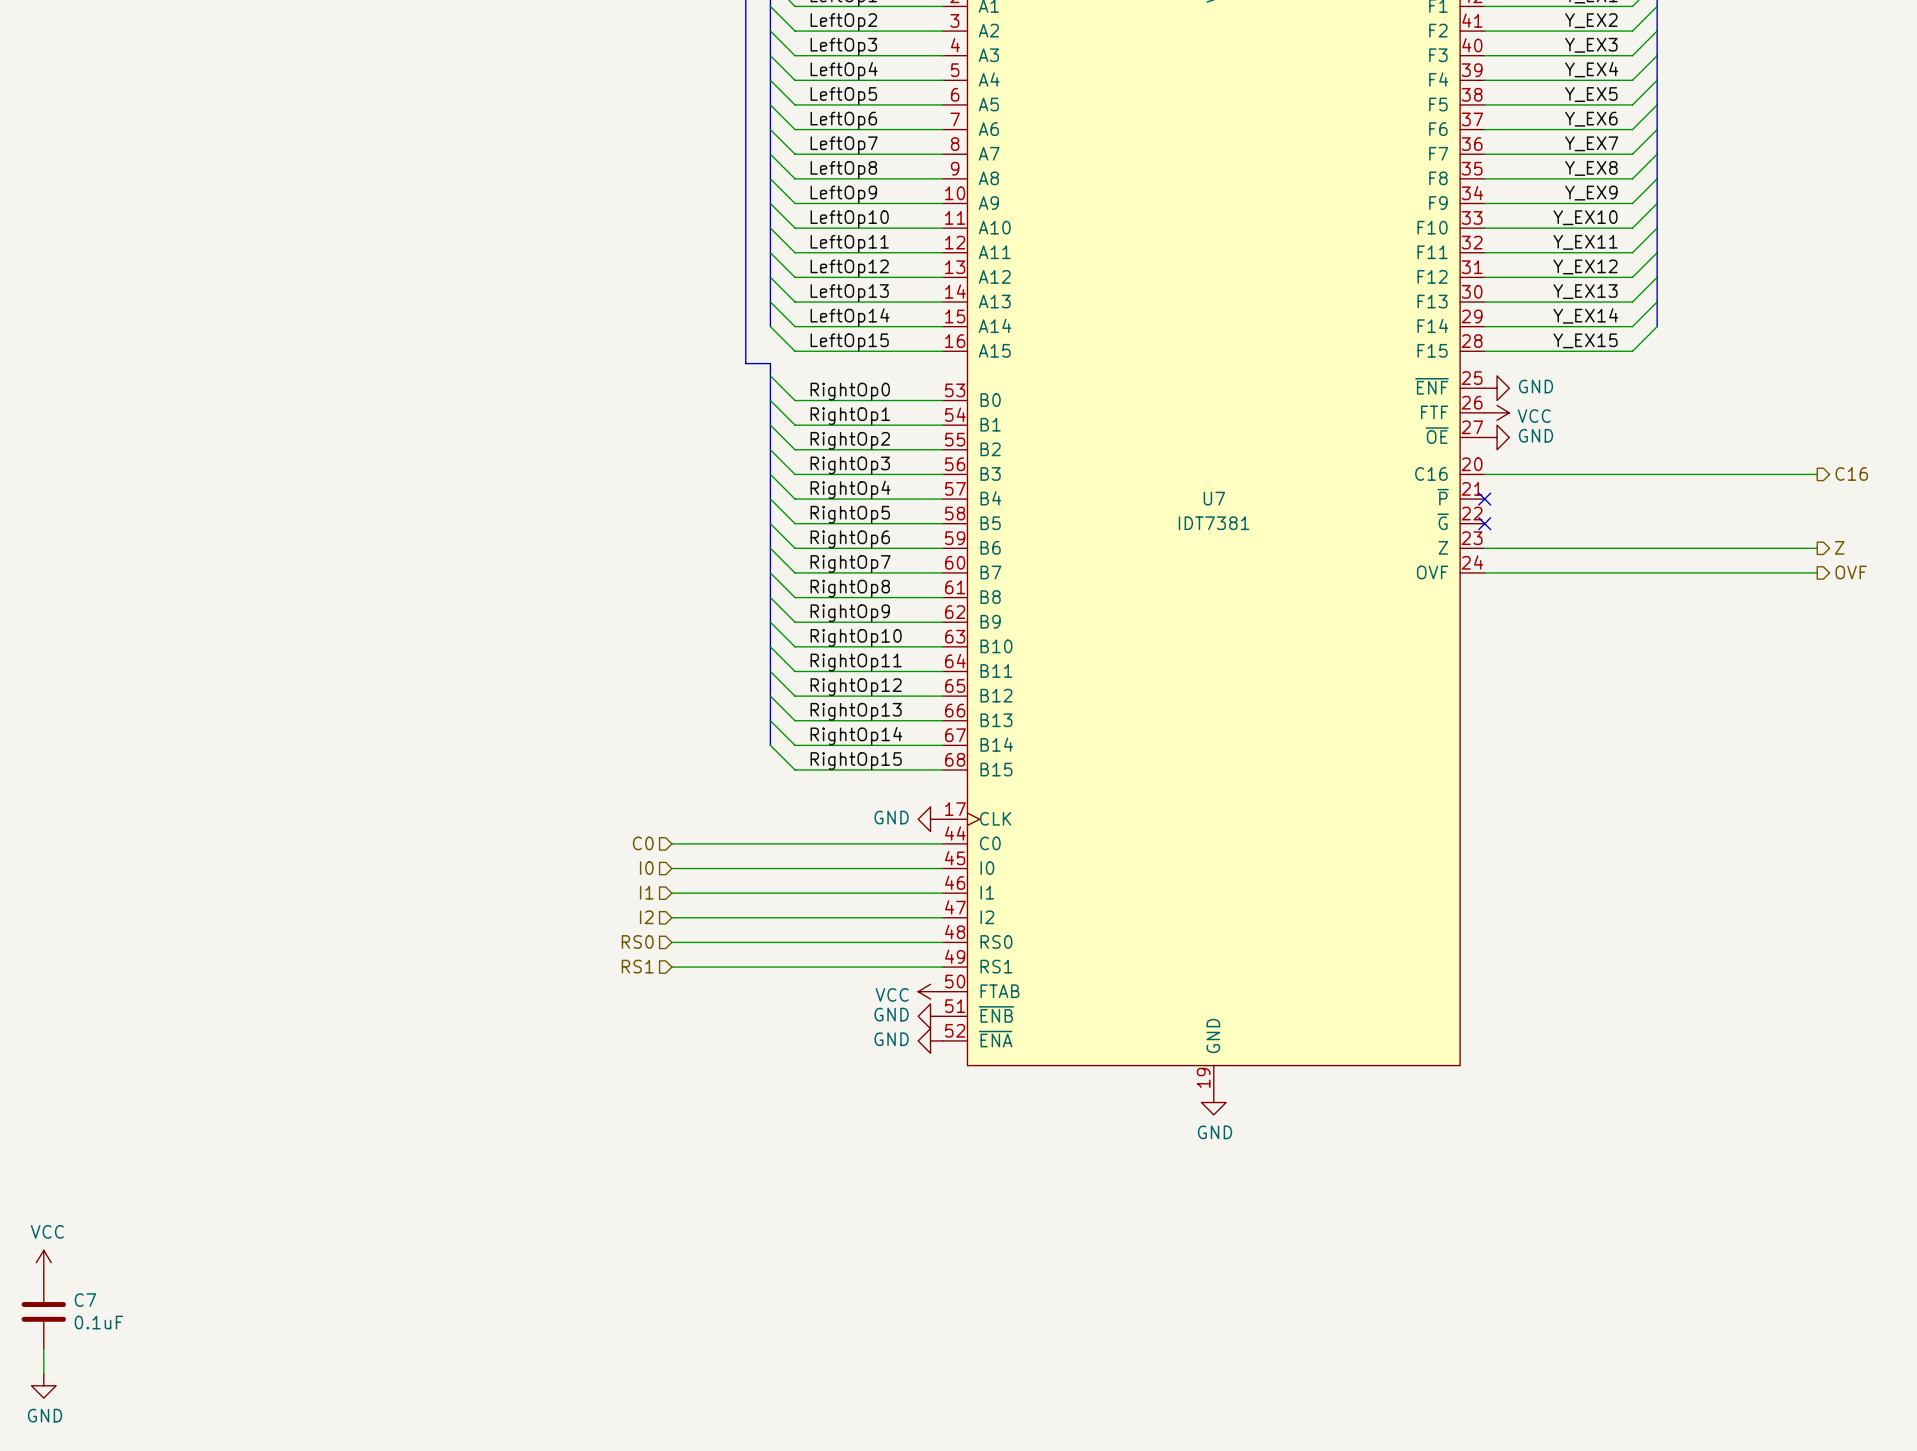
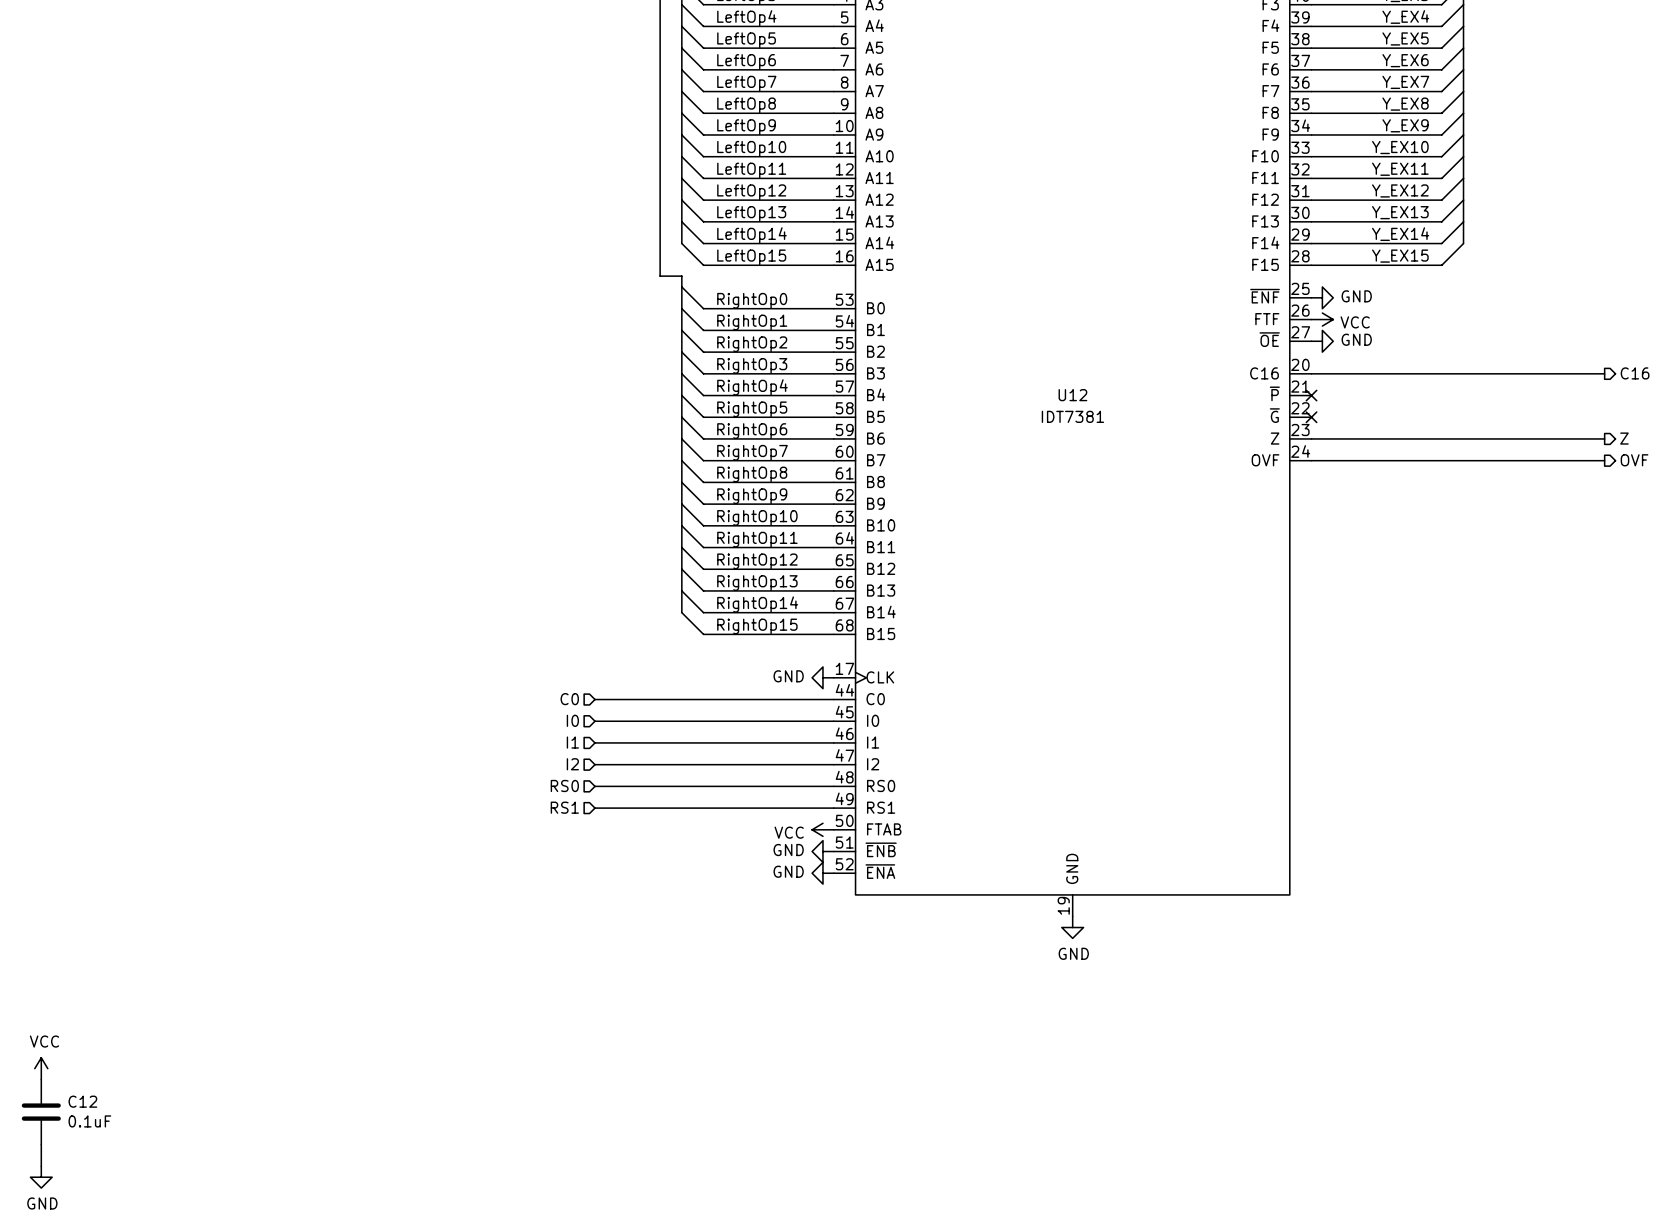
U7 name: U7 (1214, 498) -> U12 (1072, 395)
C7 name: C7 (85, 1300) -> C12 (82, 1101)

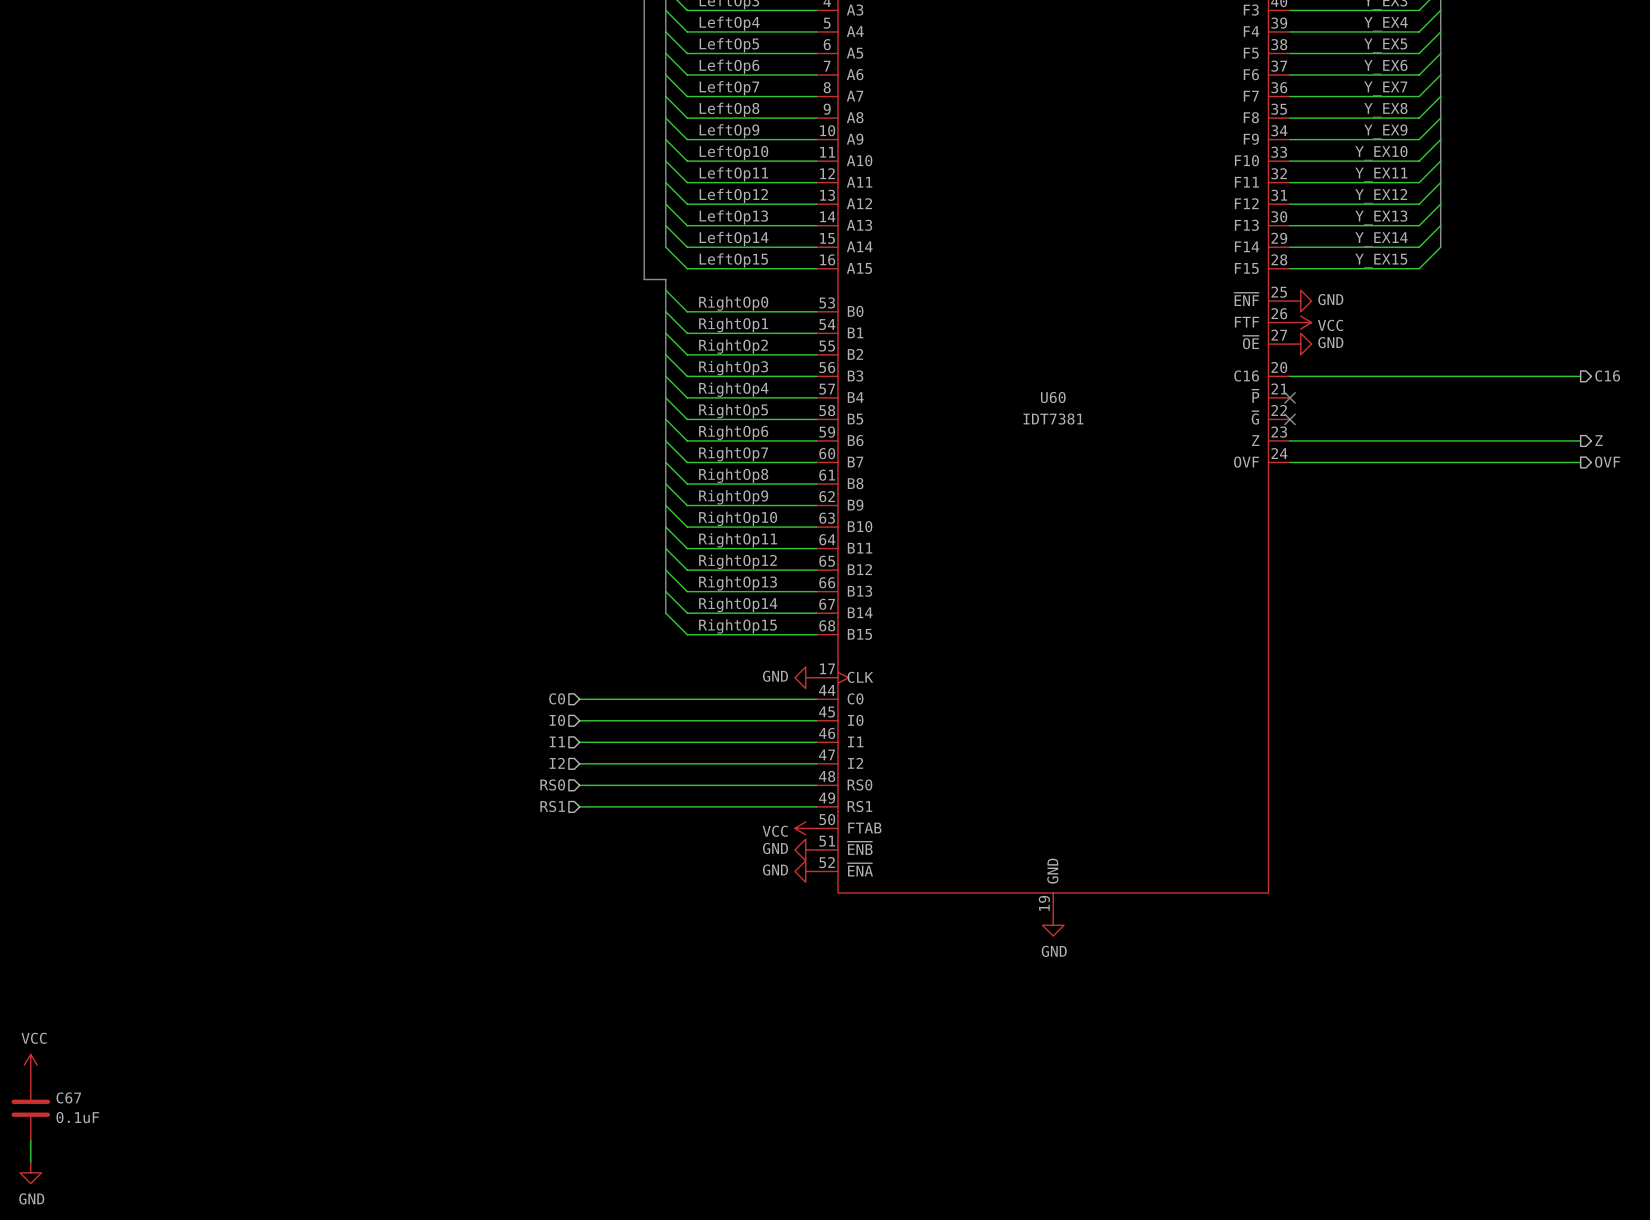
U12 name: U12 (1072, 395) -> U60 (1053, 397)
C12 name: C12 (82, 1101) -> C67 (68, 1097)

